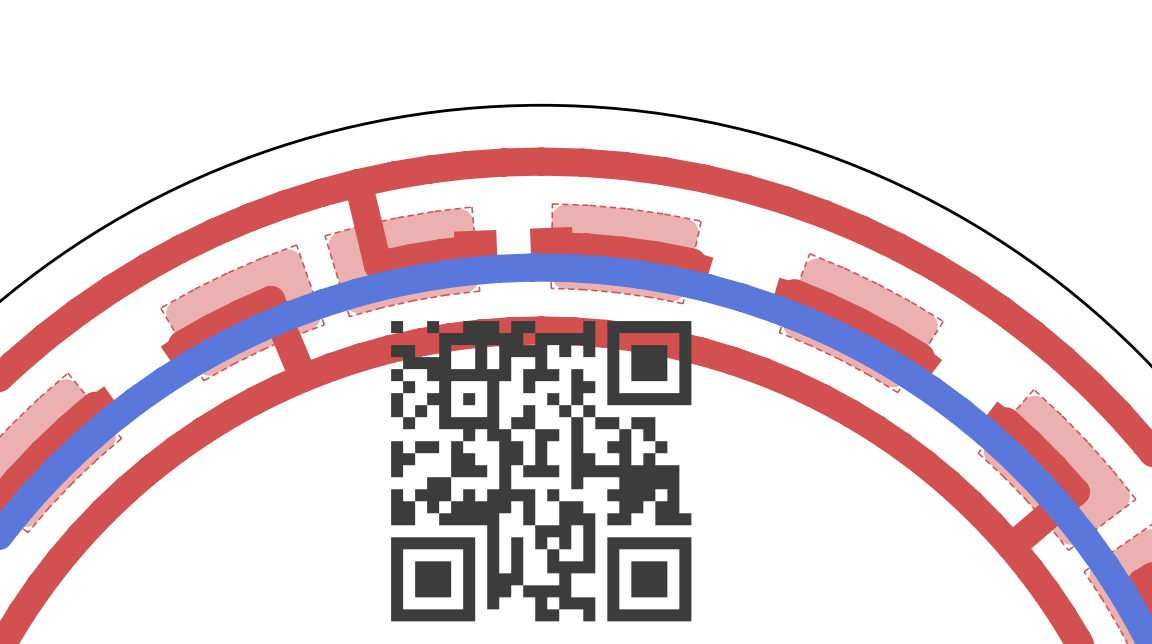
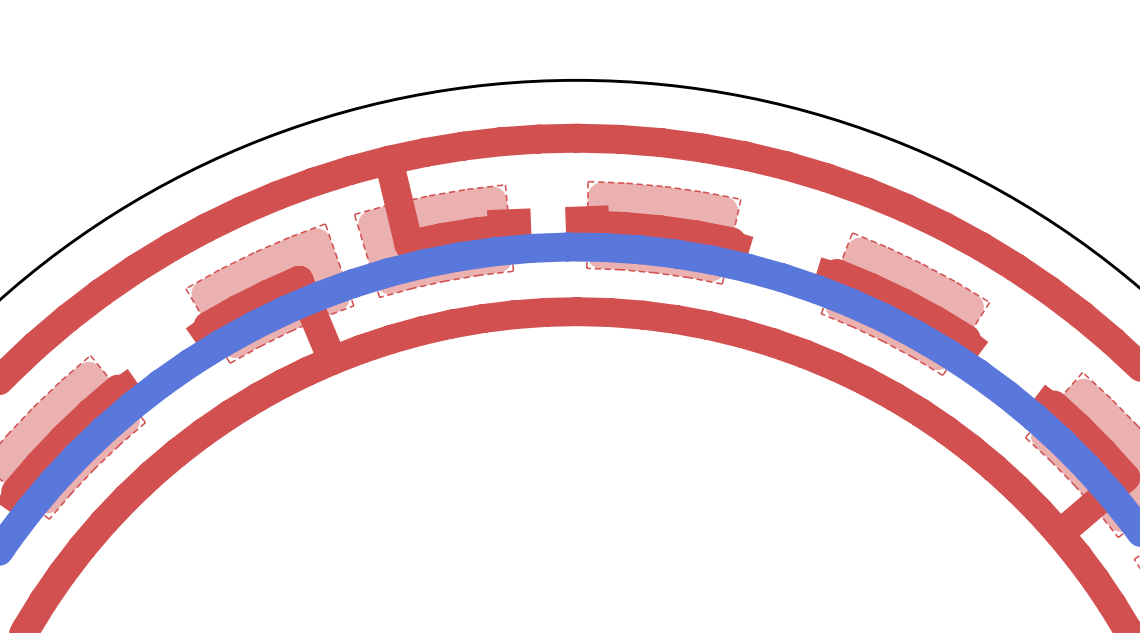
drawing: [391, 321, 692, 622] -> none

